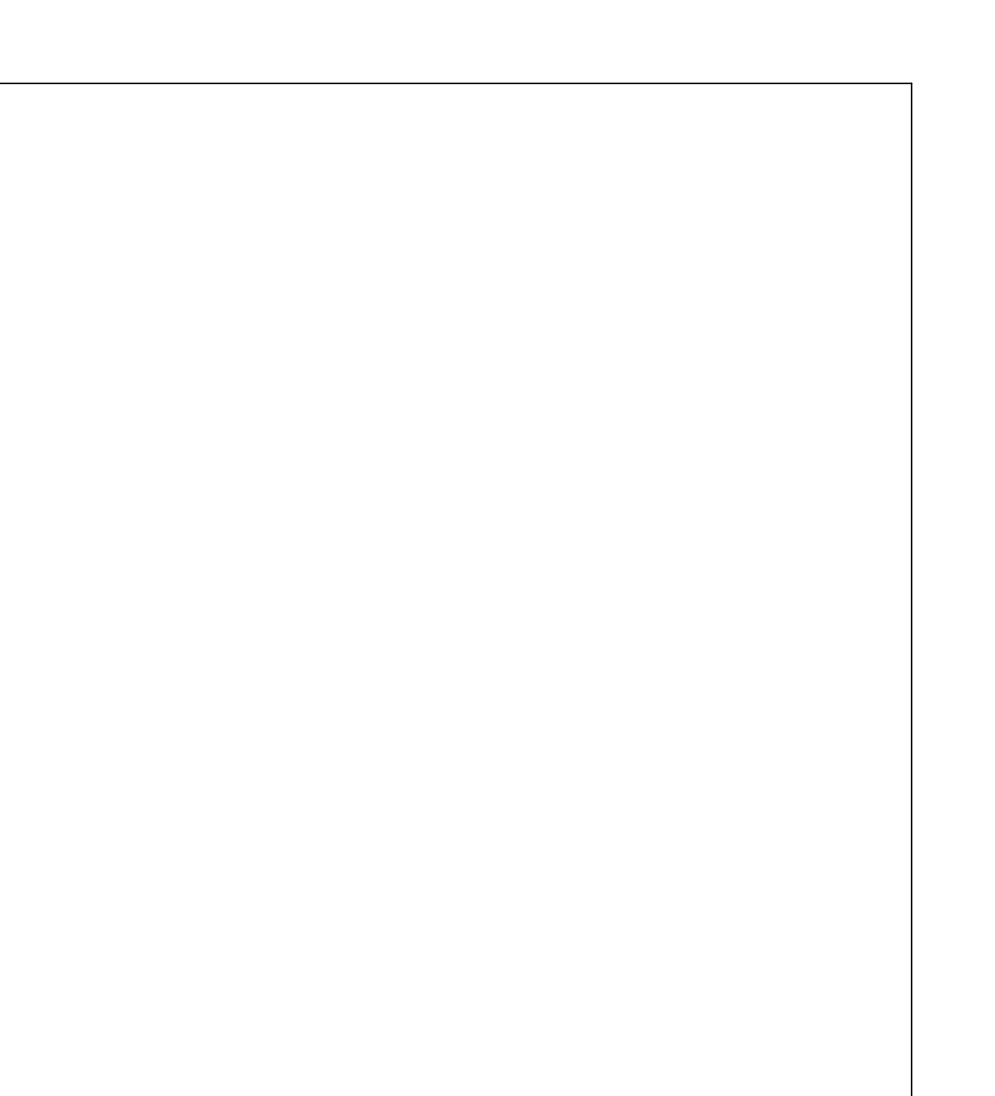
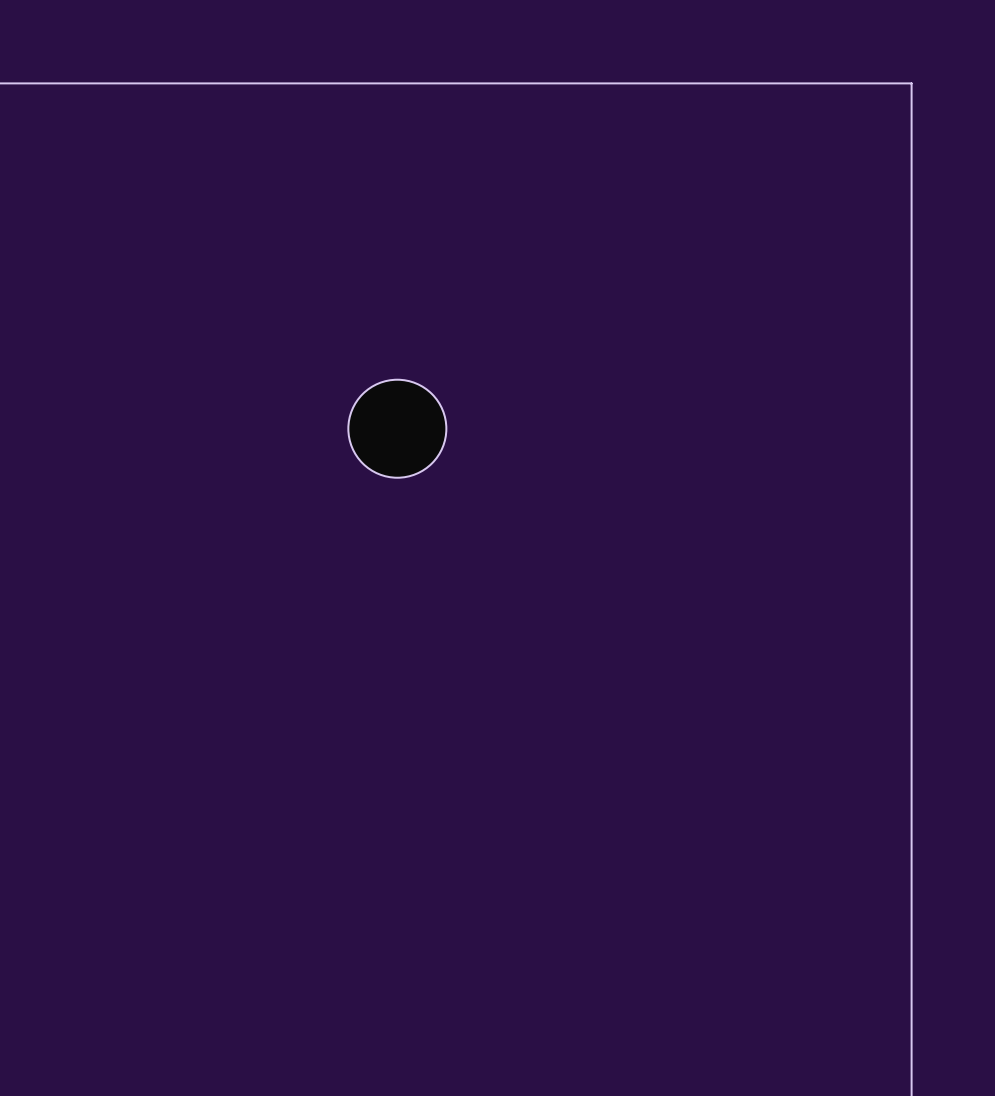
part: none -> (397, 428)

